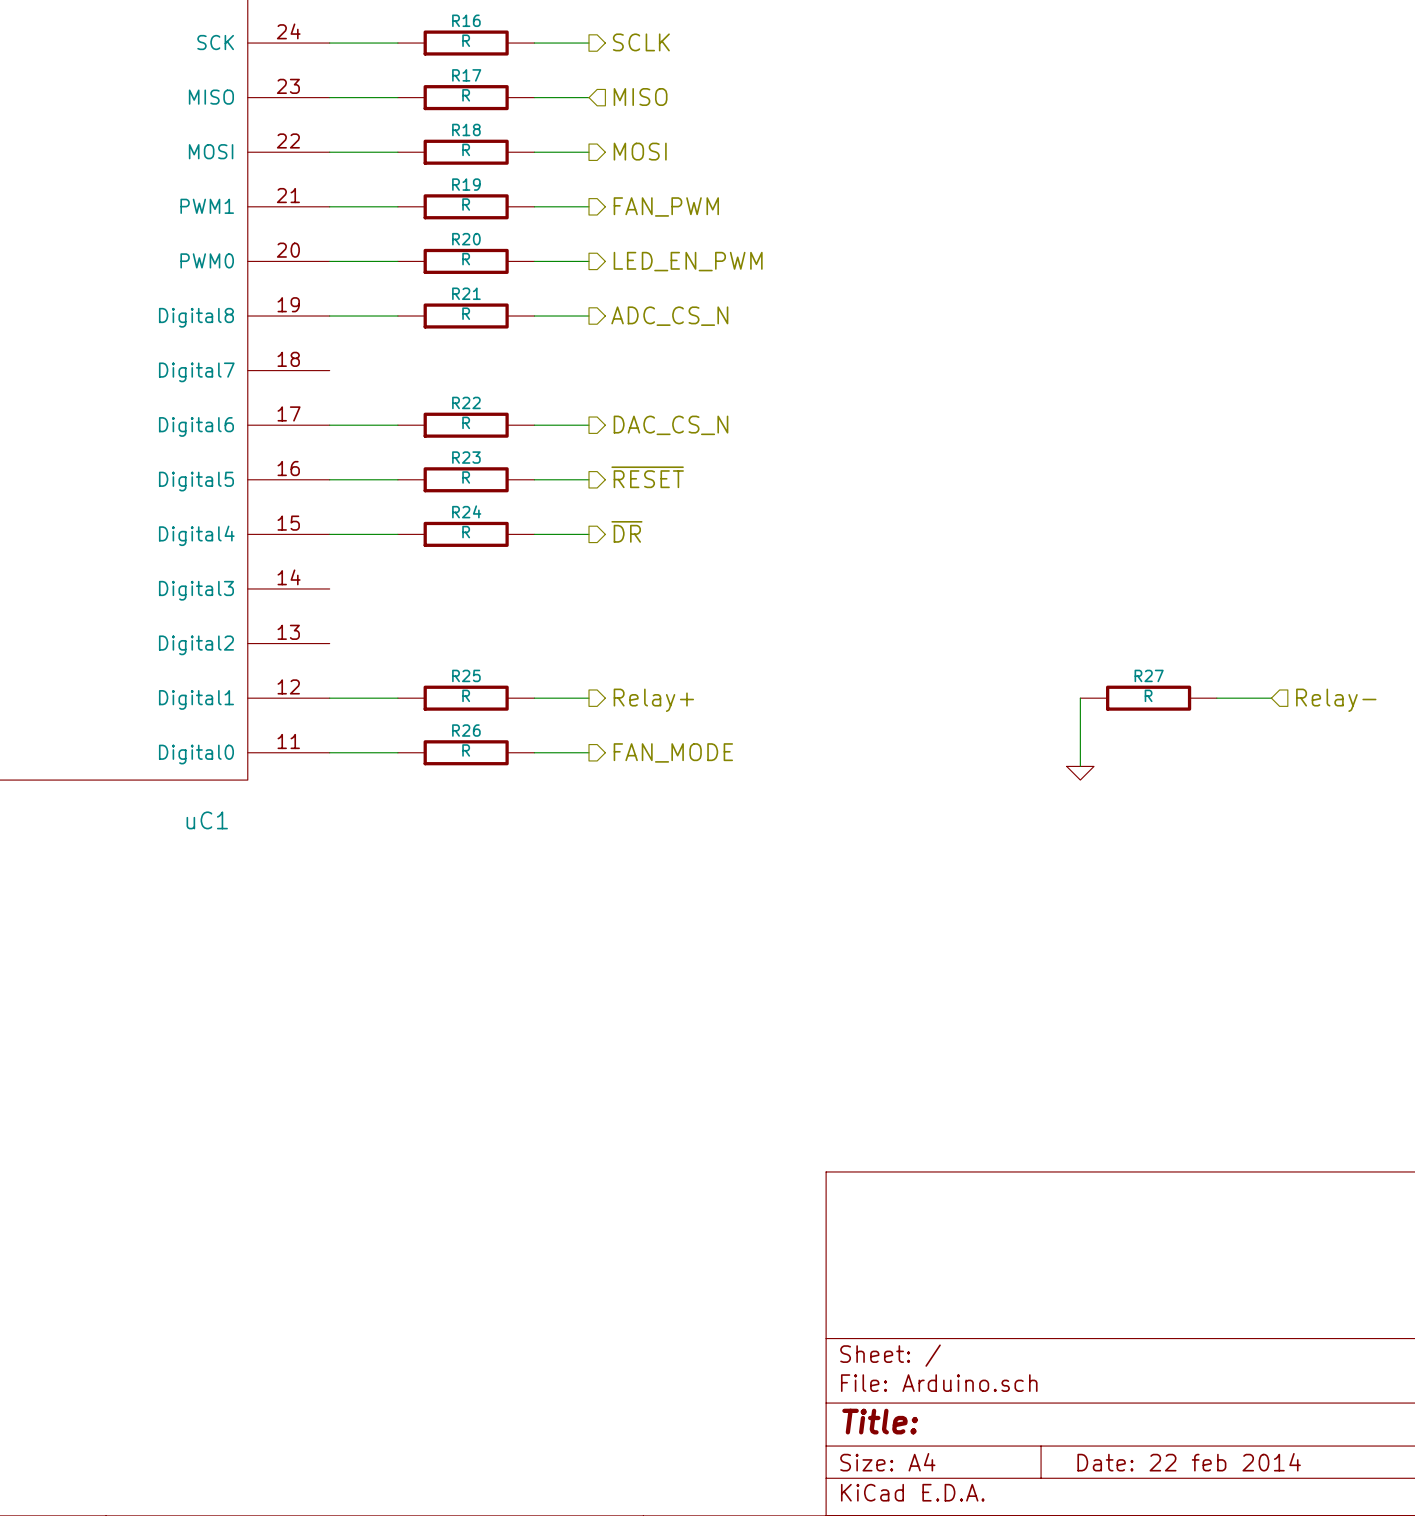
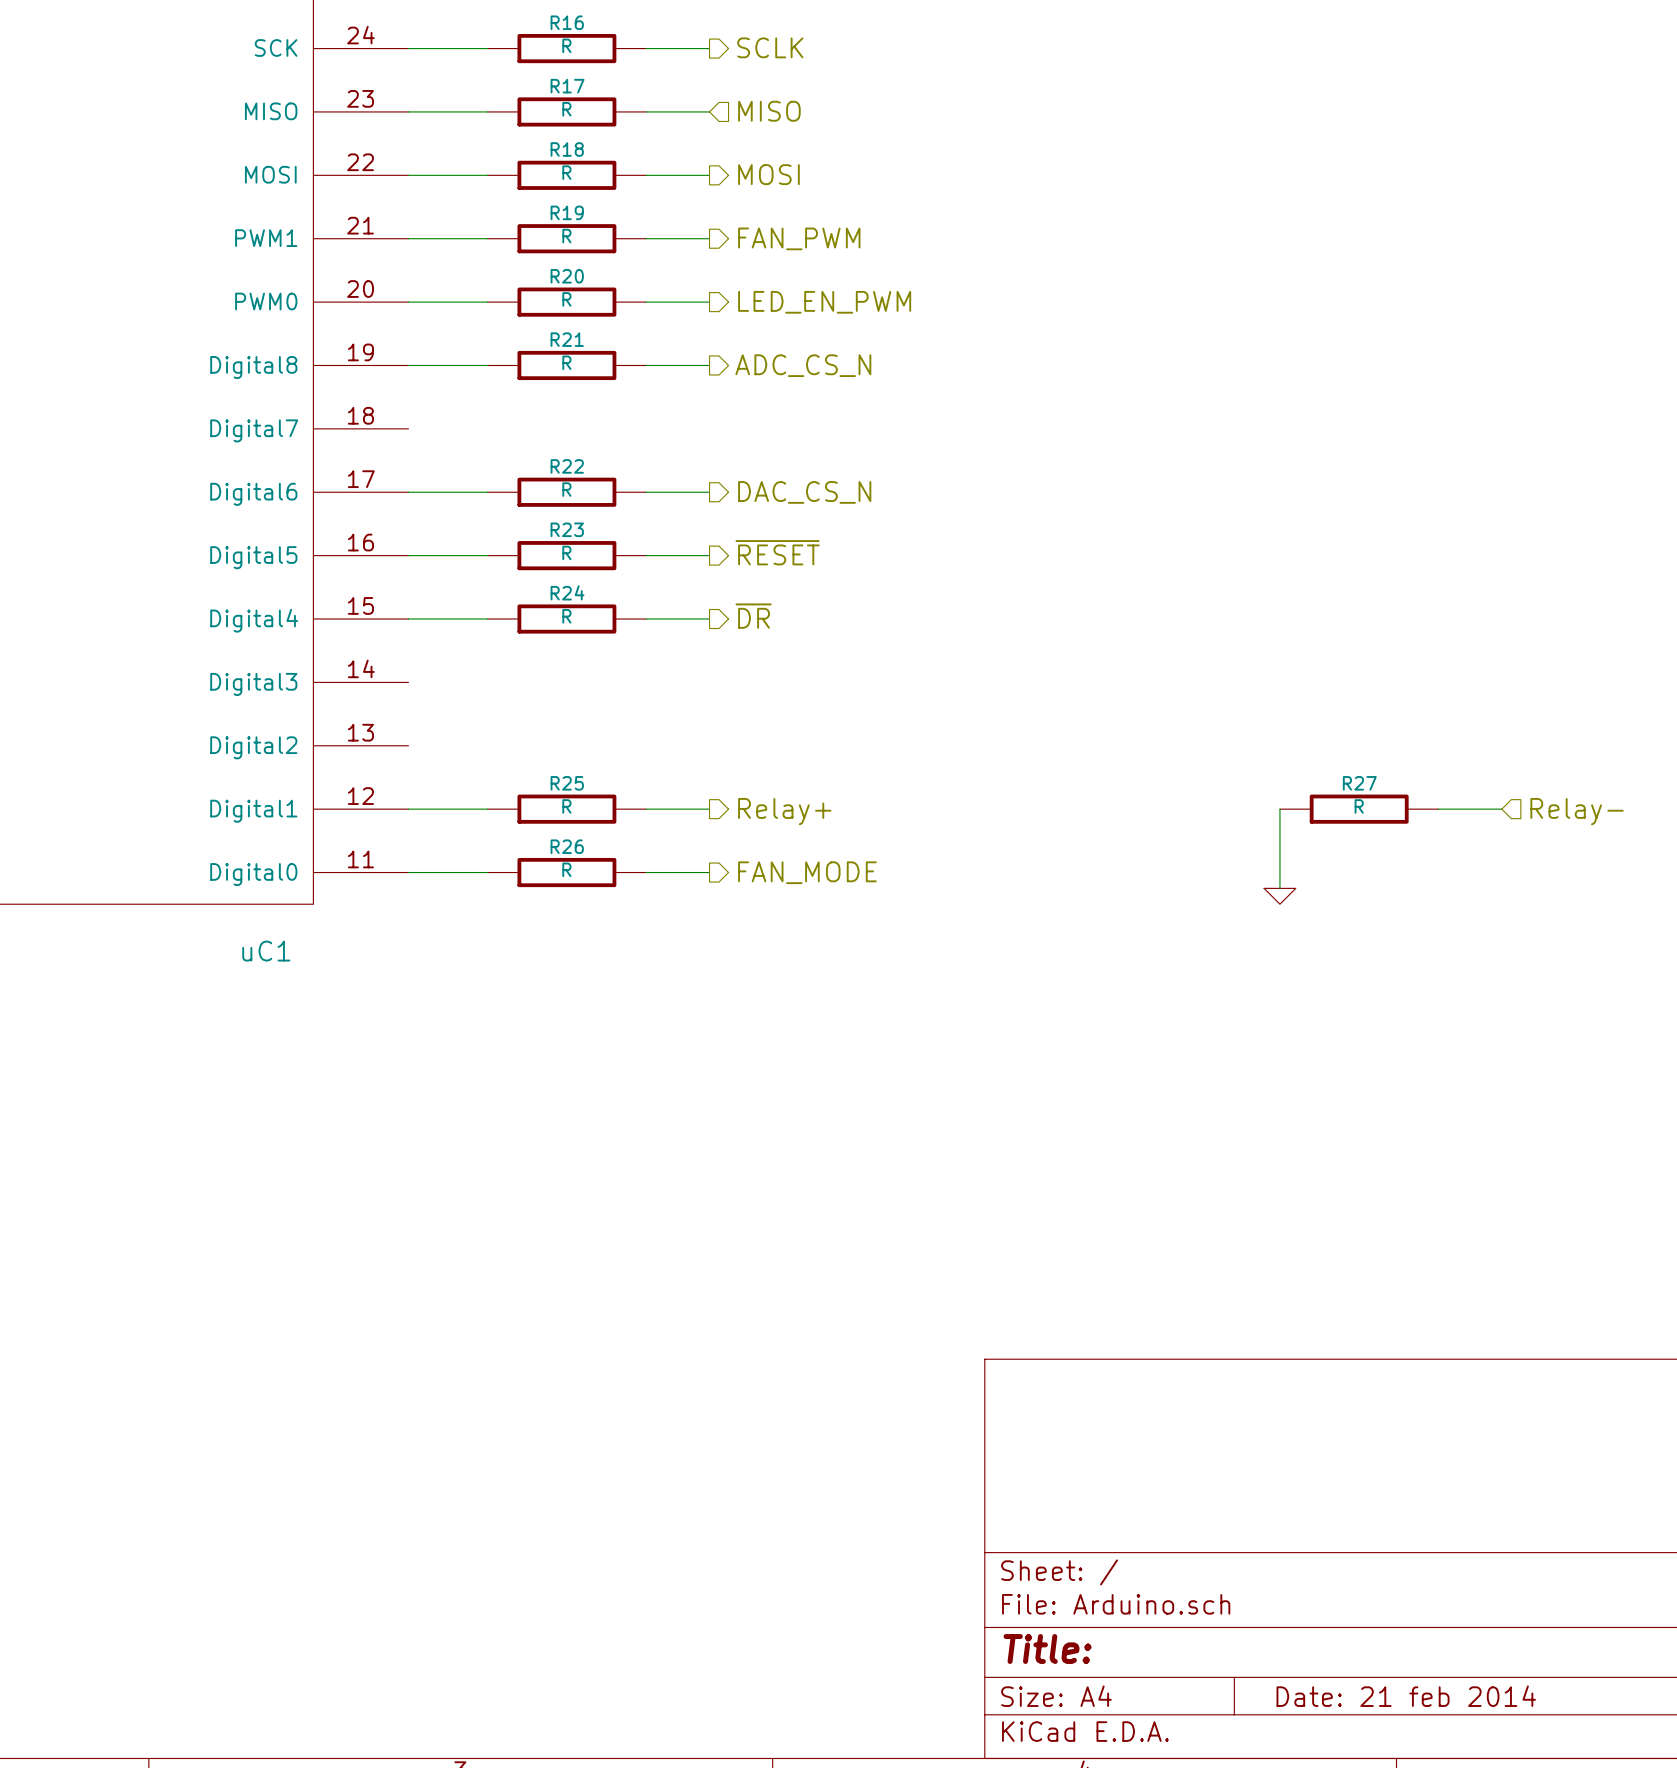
title block: Date: 22 feb 2014 (1189, 1462) -> Date: 21 feb 2014 (1406, 1696)

